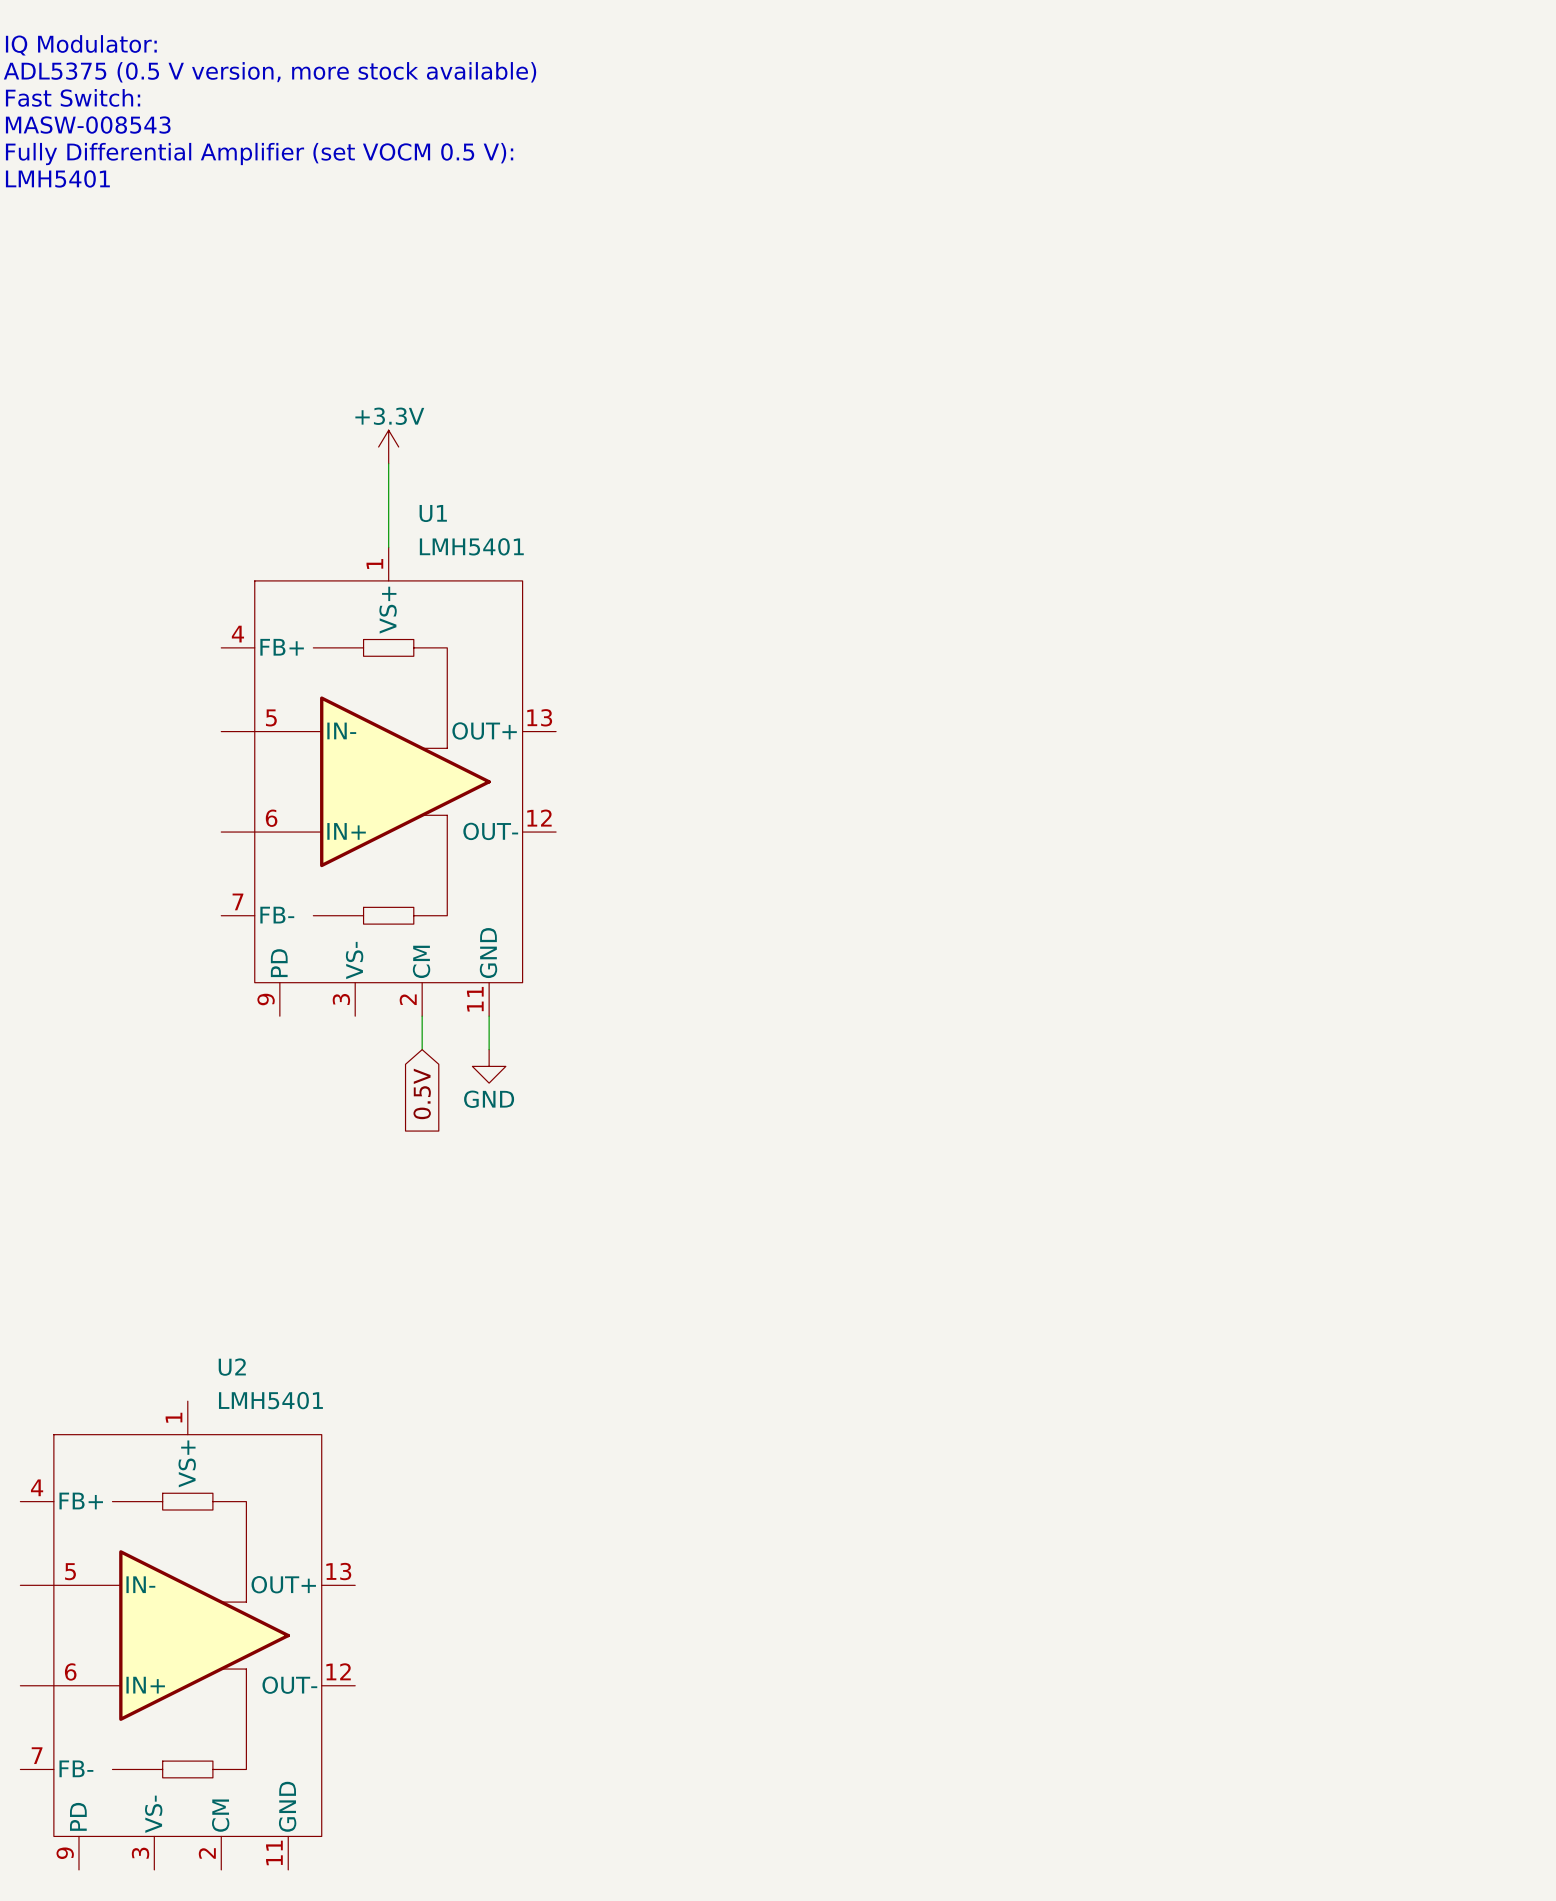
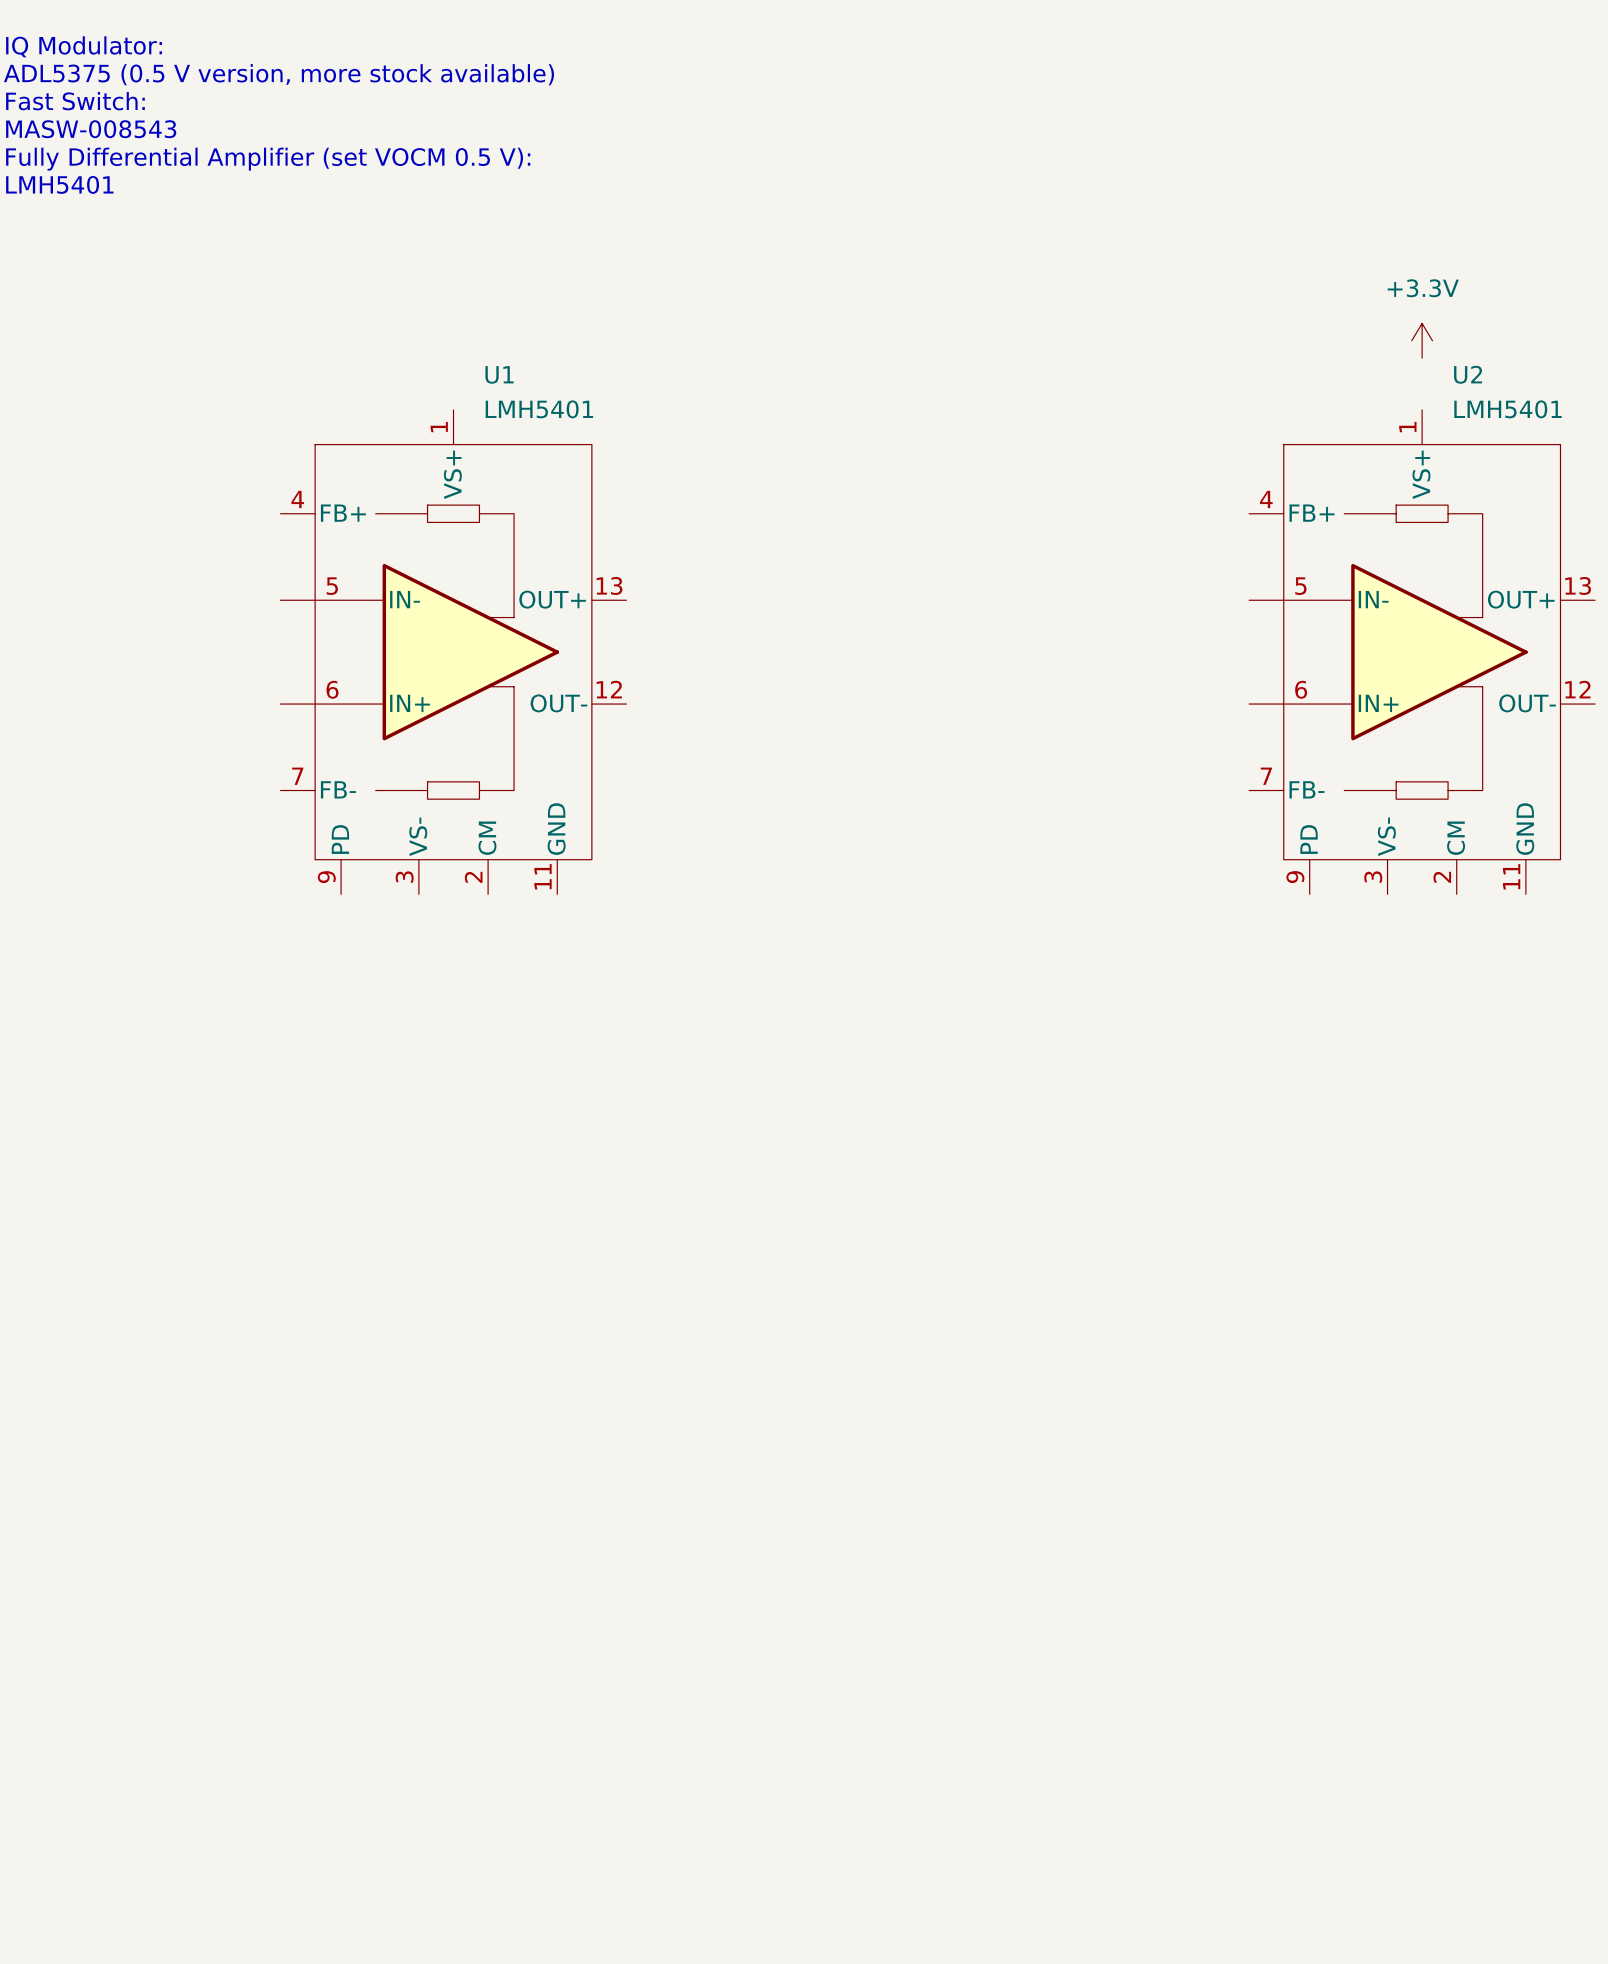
power symbol: none -> +3.3V (1422, 340)
power symbol: +3.3V (388, 447) -> none
wire: (388, 463) (388, 547) -> none
U1 position: (388, 781) -> (453, 652)
wire: (422, 1016) (422, 1049) -> none
wire: (489, 1016) (489, 1049) -> none
power symbol: GND (489, 1066) -> none
global label: 0.5V (422, 1093) -> none
U2 position: (187, 1635) -> (1422, 652)

